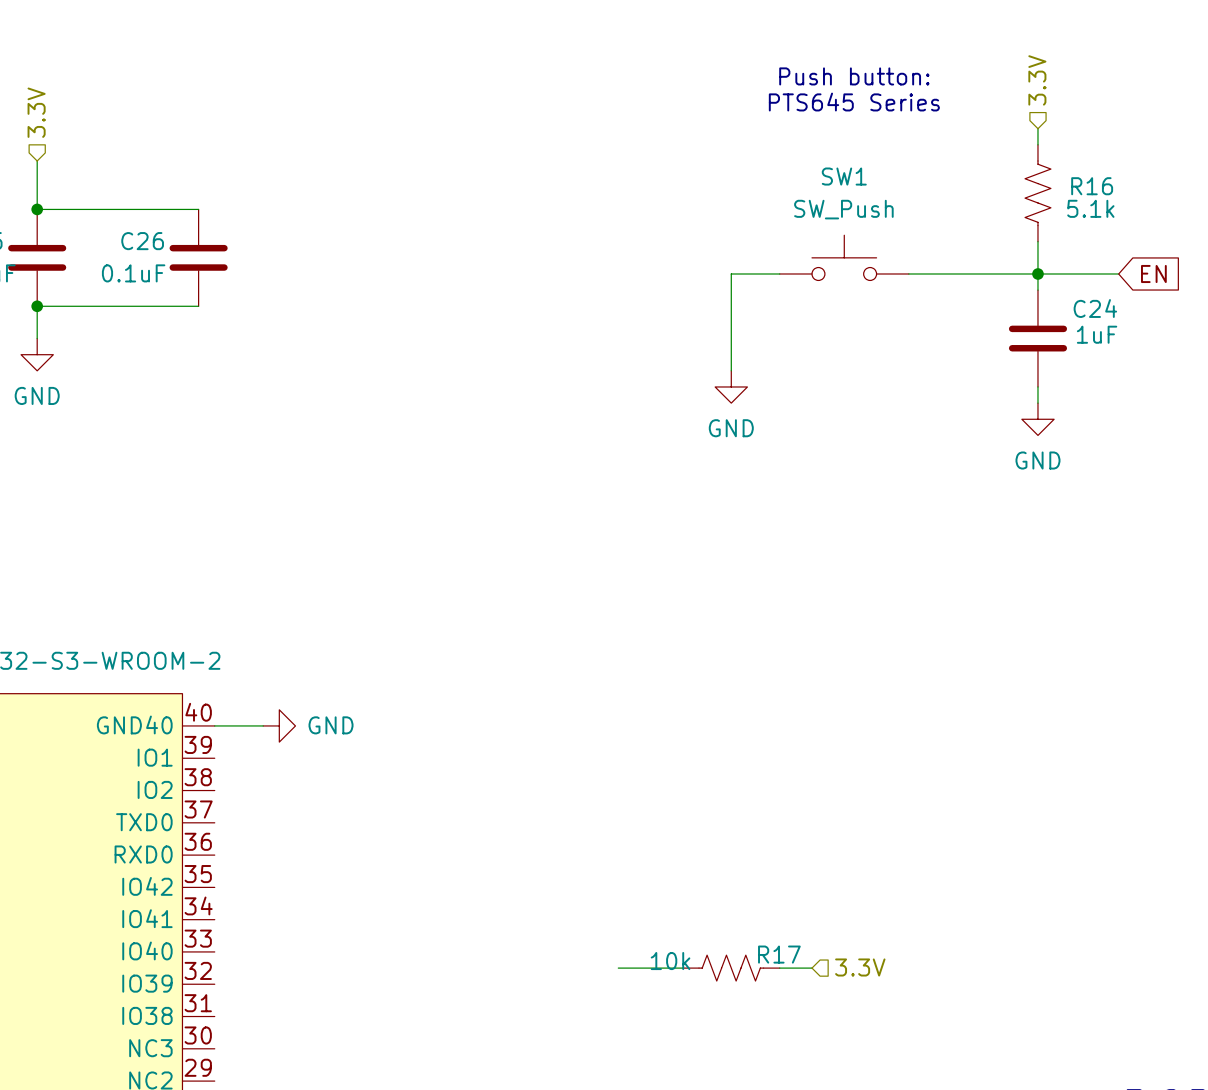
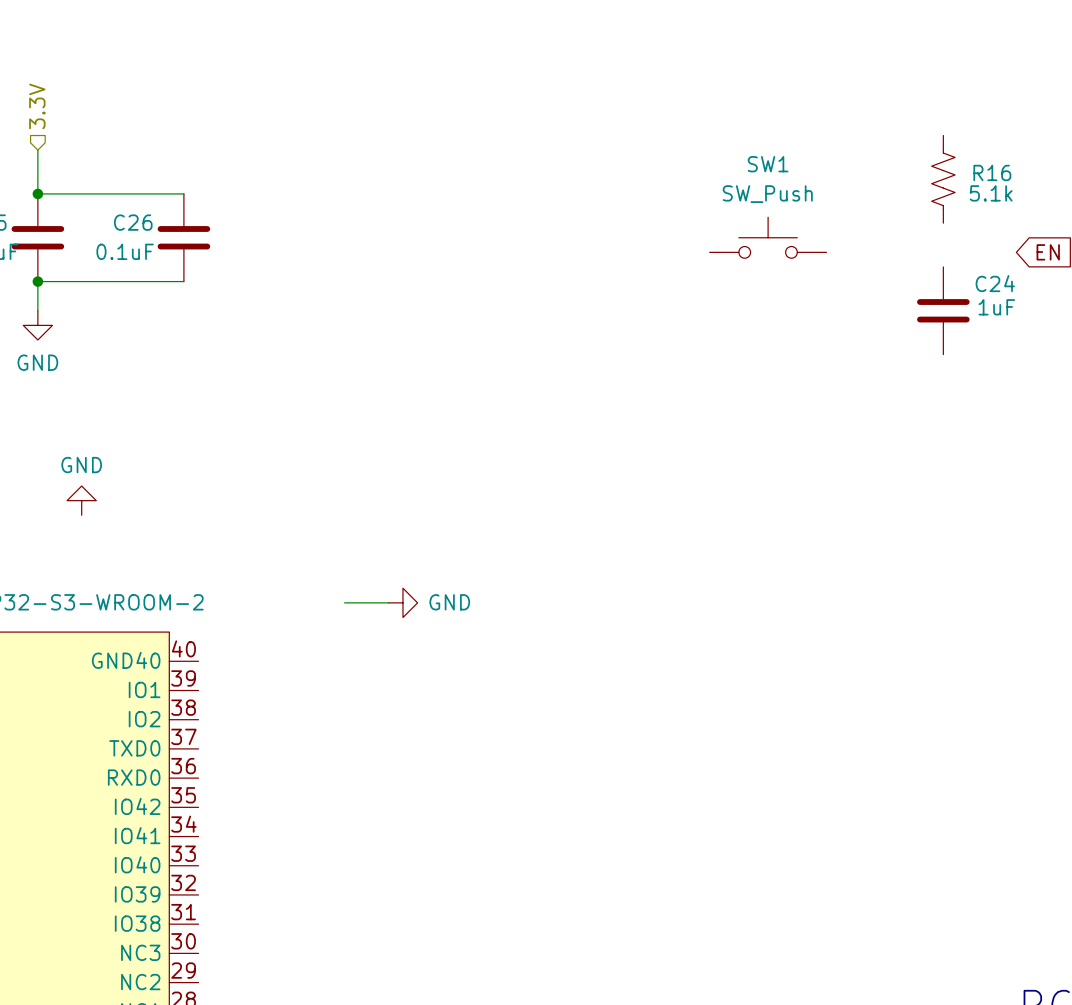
text: Push button: (854, 76) -> none
hierarchical label: 3.3V (1037, 80) -> none
text: PTS645 Series (854, 102) -> none
wire: (1037, 128) (1037, 144) -> none
wire: (1037, 241) (1037, 290) -> none
wire: (779, 273) (731, 273) (731, 370) -> none
wire: (908, 273) (1118, 273) -> none
junction: (1037, 273) -> none
power symbol: GND (731, 386) -> none
wire: (1037, 386) (1037, 403) -> none
power symbol: GND (1037, 419) -> none
power symbol: none -> GND (81, 500)
power symbol: none -> GND (402, 602)
wire: (214, 725) (263, 725) -> (344, 602) (388, 602)
power symbol: GND (279, 725) -> none
hierarchical label: 3.3V (860, 967) -> none
wire: (618, 968) (682, 968) -> none
R17: 10k (731, 968) -> none
wire: (779, 968) (812, 968) -> none

